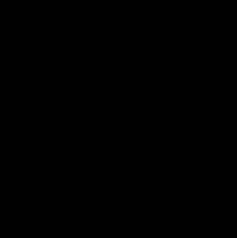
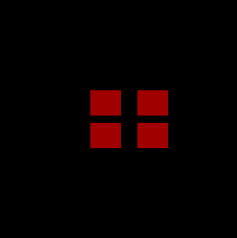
part: none -> (129, 119)

